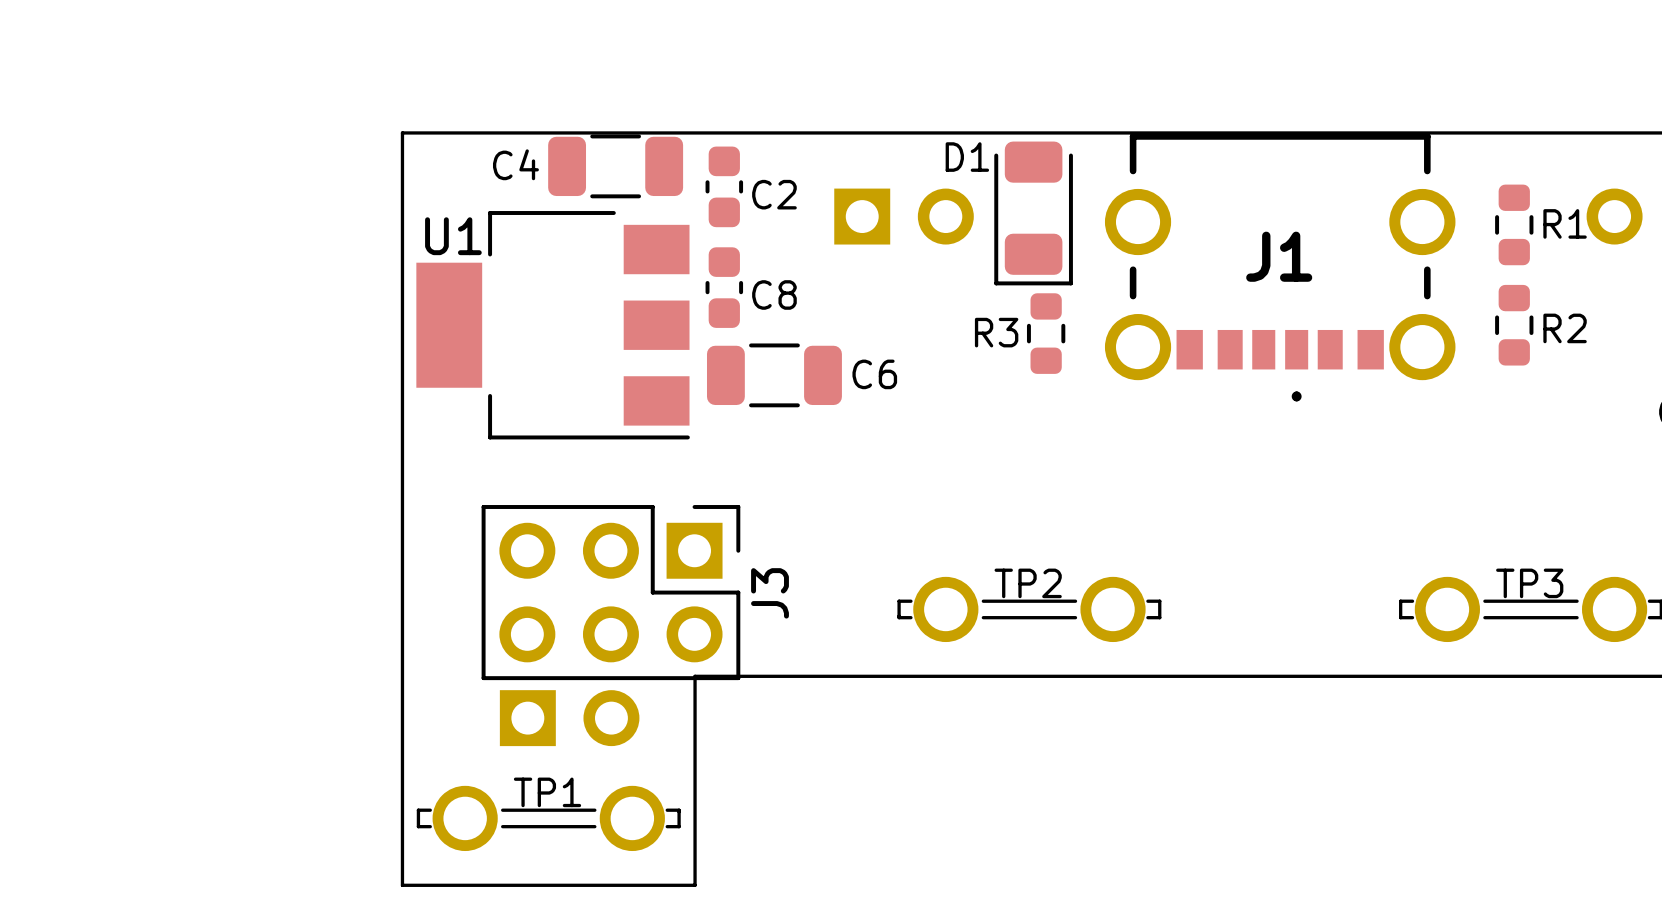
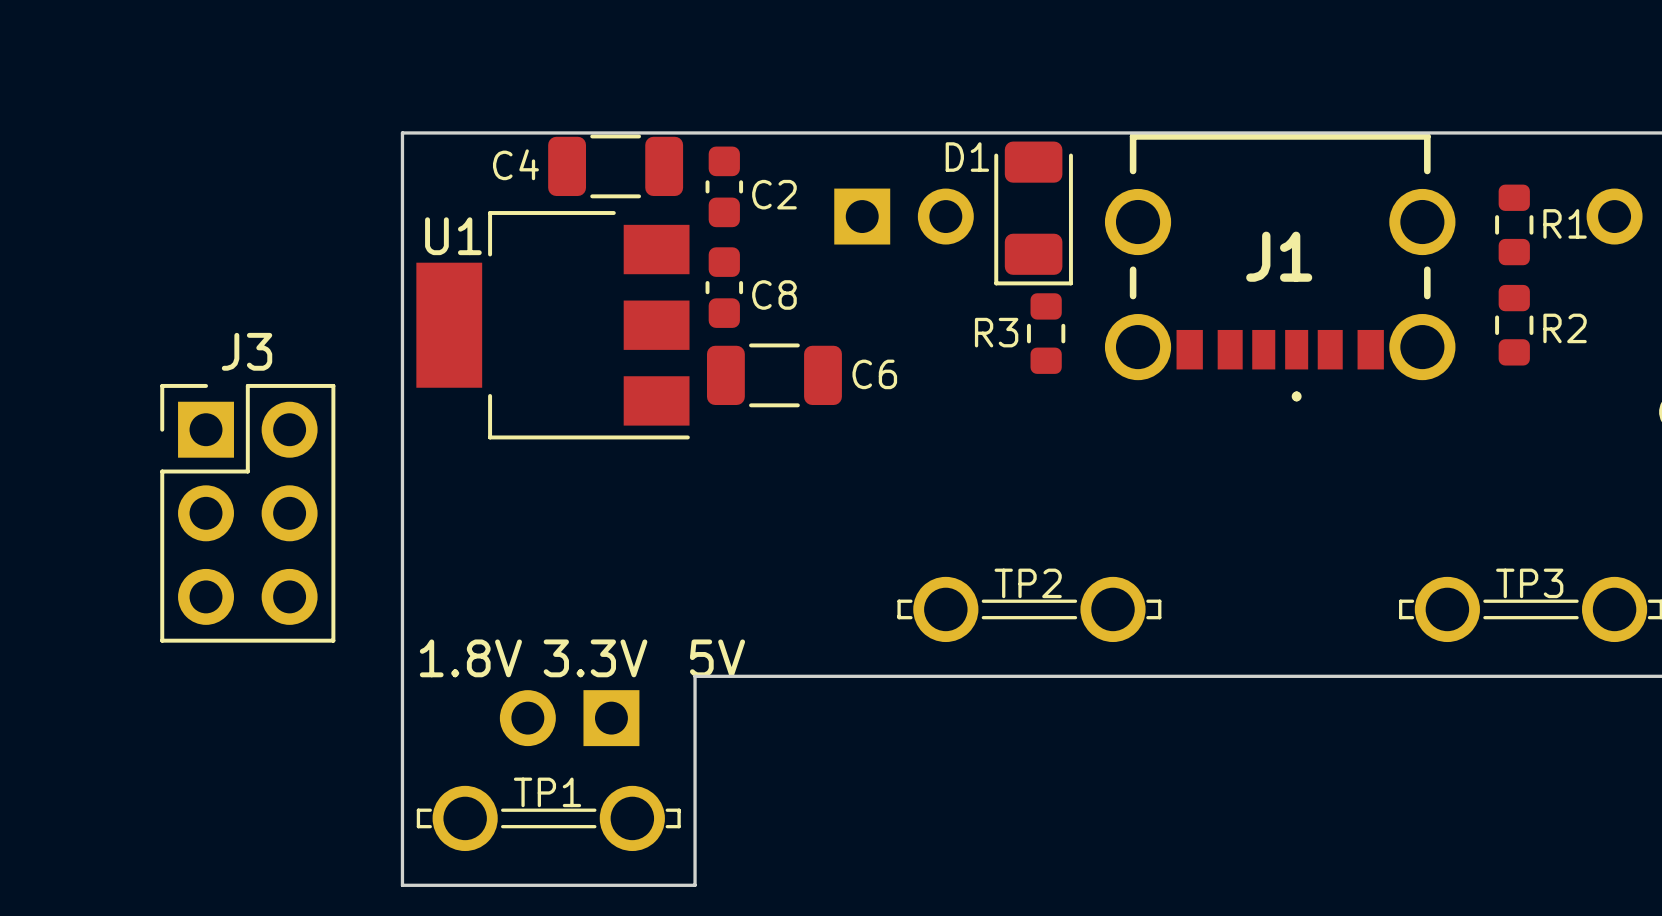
J3 rotation: 0° (610, 592) -> 90° counterclockwise (247, 513)
J3 position: (610, 592) -> (247, 513)
text: none -> 1.8V (470, 658)
text: none -> 3.3V (595, 658)
text: none -> 5V (717, 658)
part rotation: 0° (569, 718) -> 180° (569, 718)

